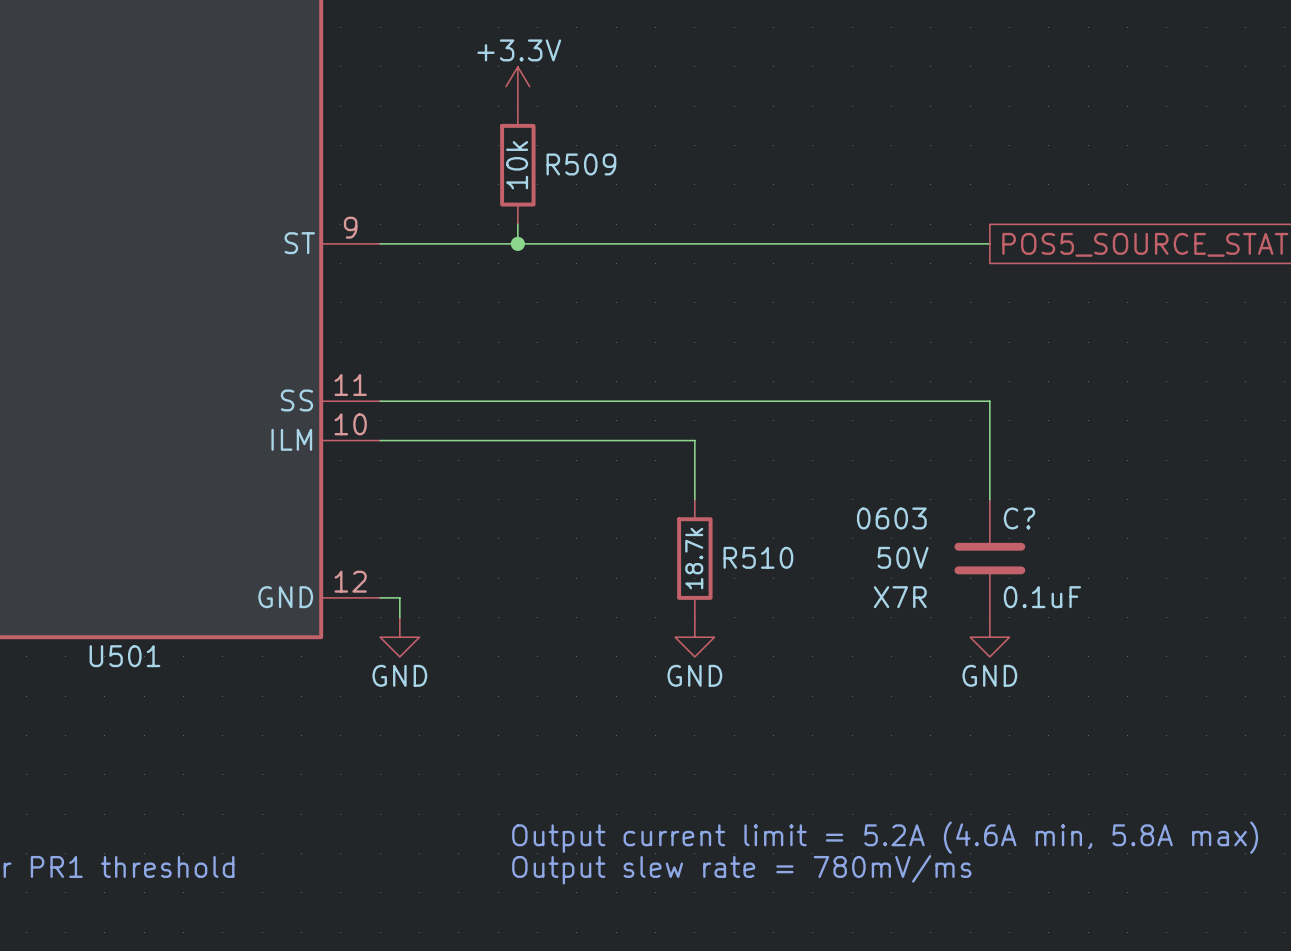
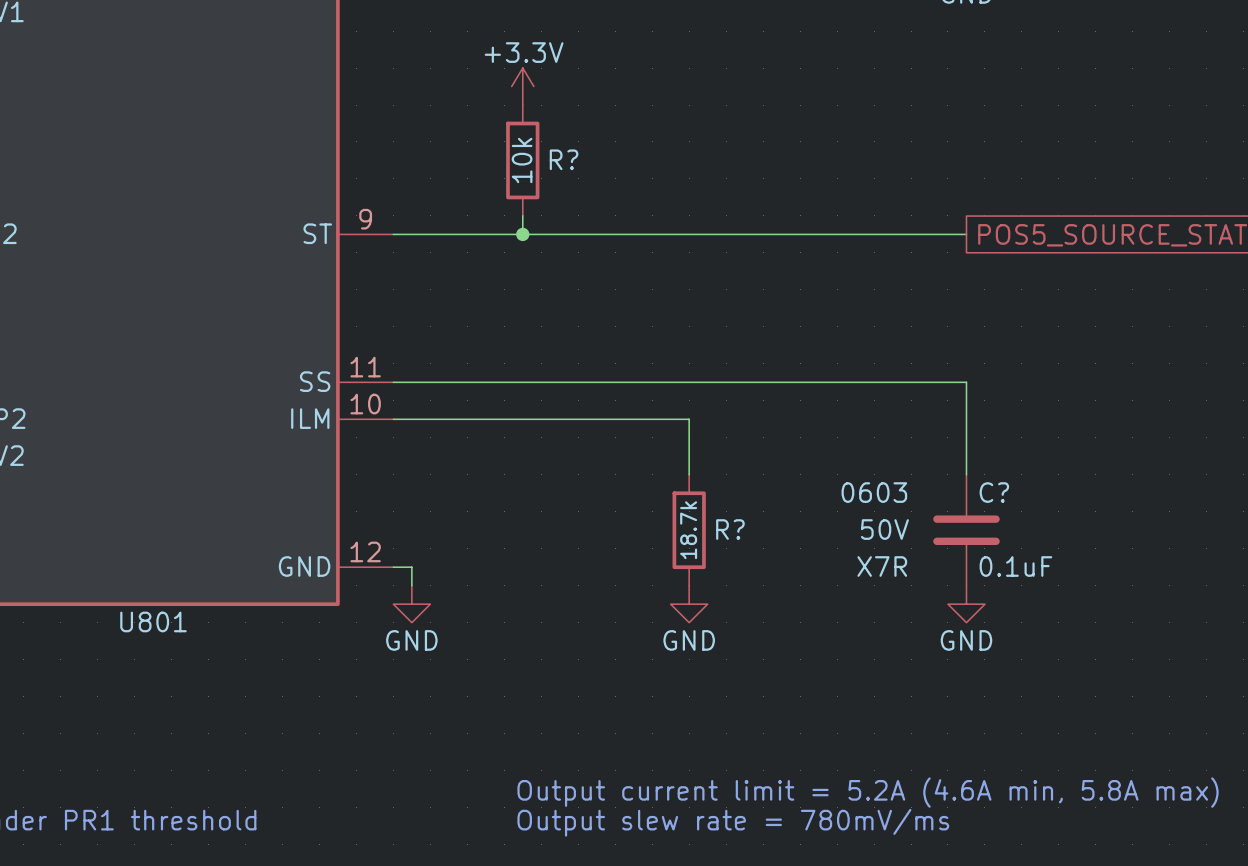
R509 name: R509 (581, 164) -> R? (564, 159)
R510 name: R510 (758, 557) -> R? (730, 529)
U501 name: U501 (124, 656) -> U801 (153, 621)

